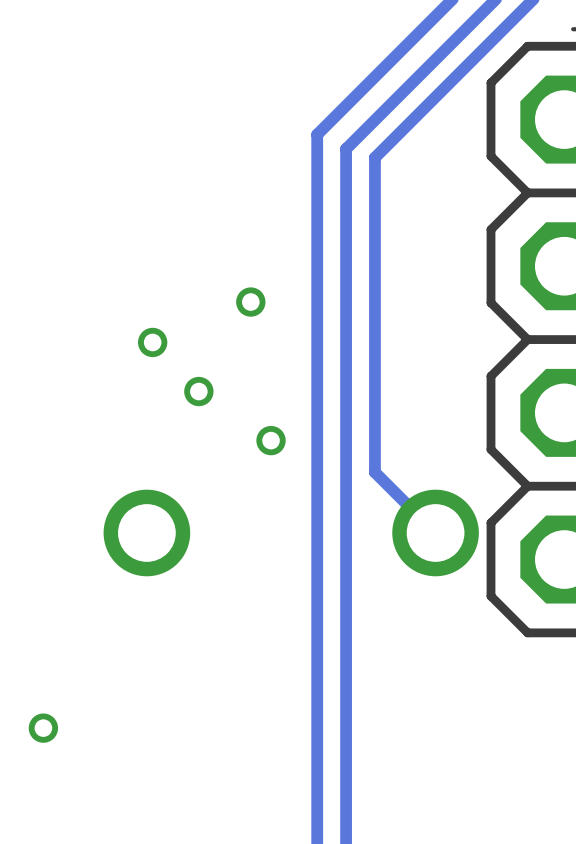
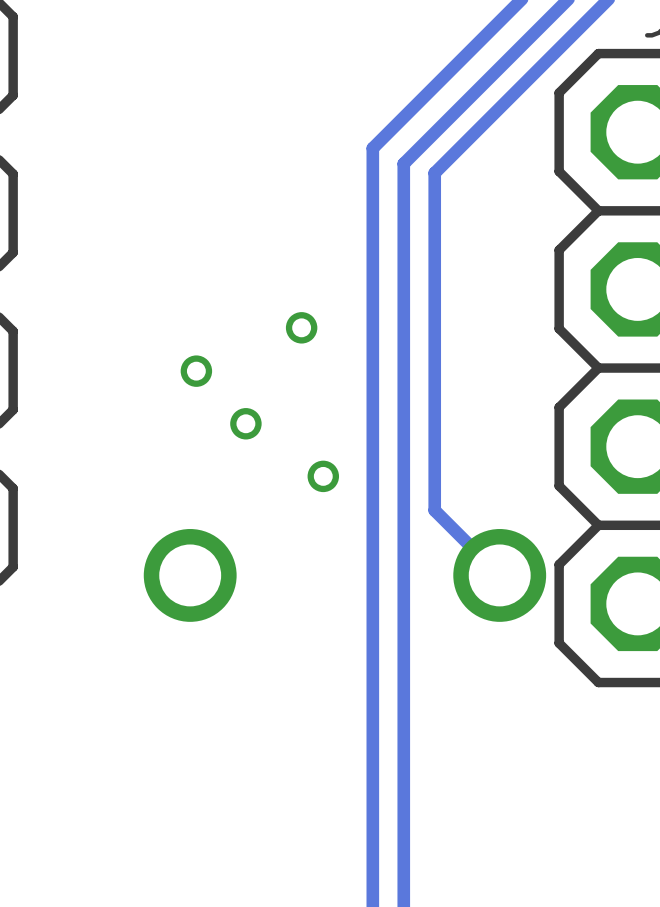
via: (43, 728) -> none

